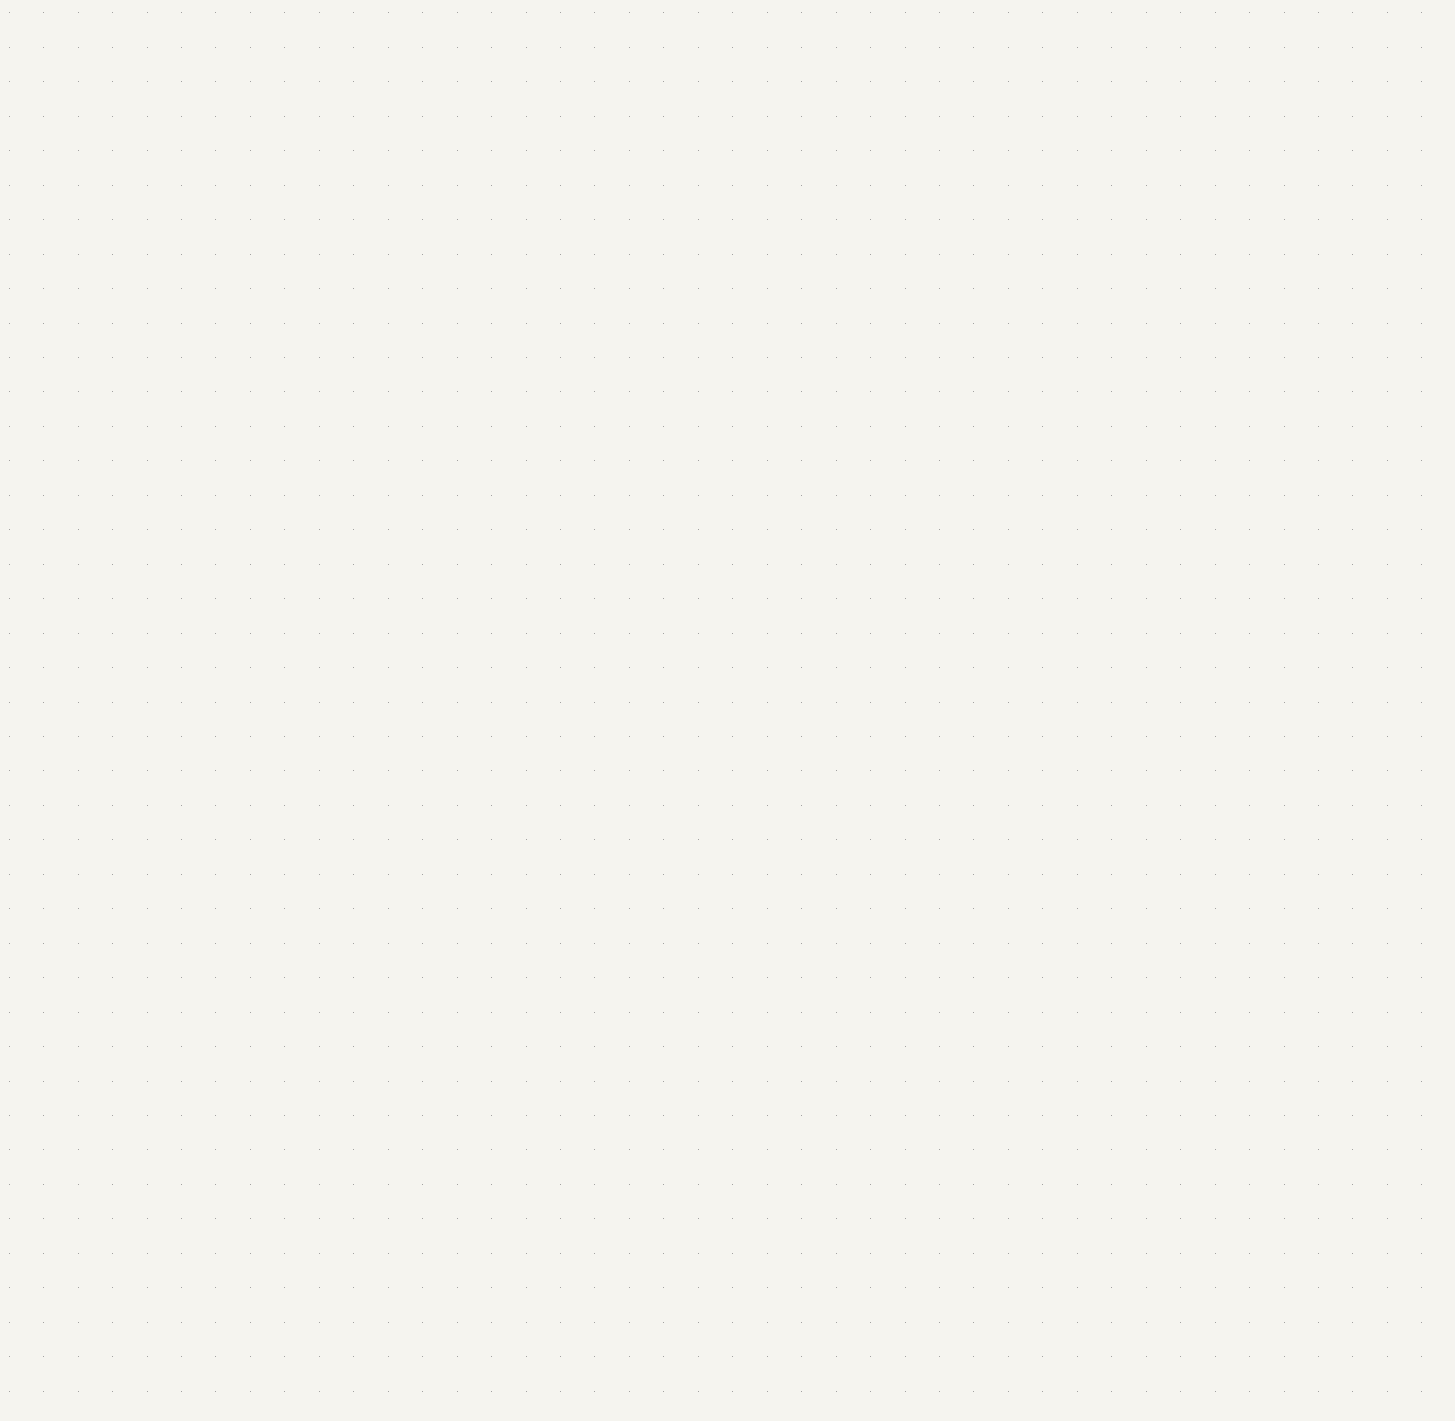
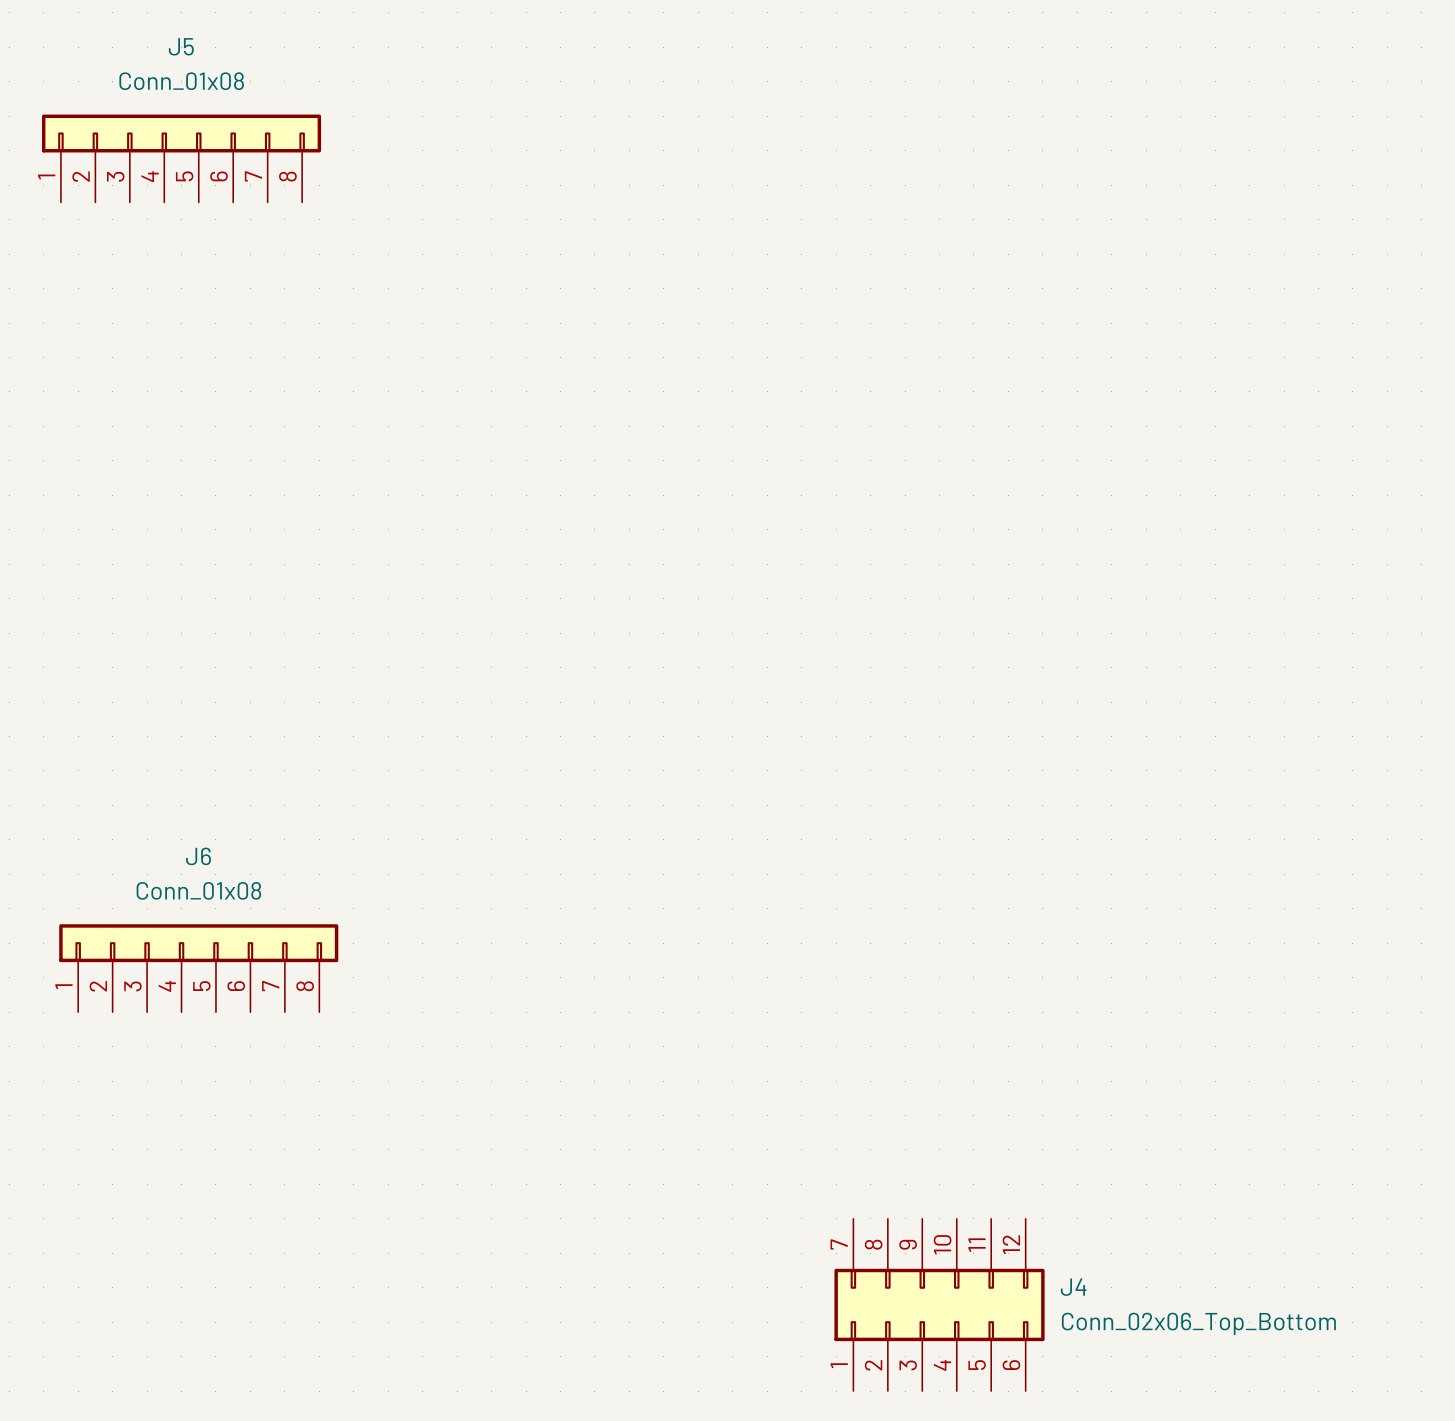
J5: none -> Conn_01x08 (181, 158)
J6: none -> Conn_01x08 (198, 968)
J4: none -> Conn_02x06_Top_Bottom (939, 1304)

